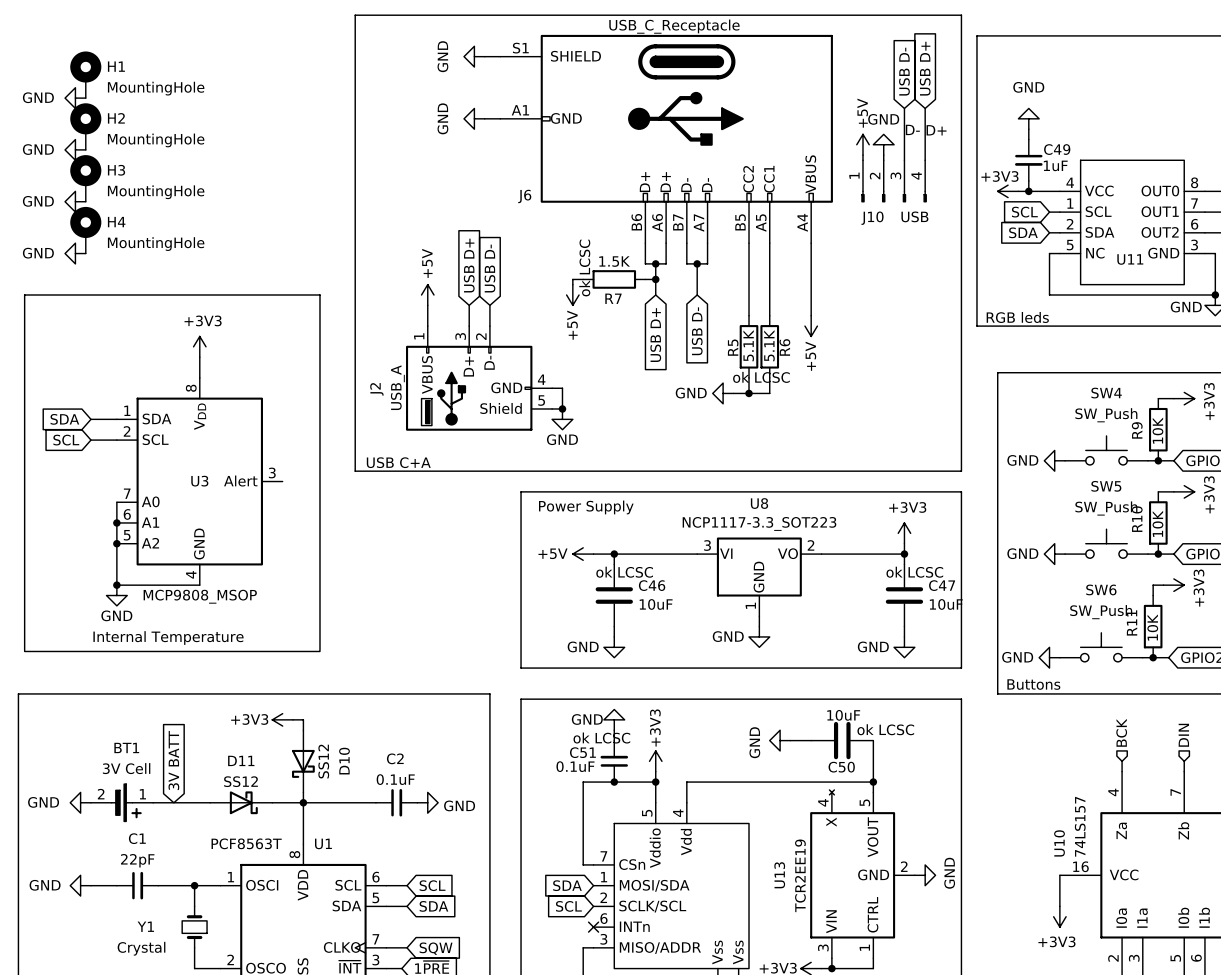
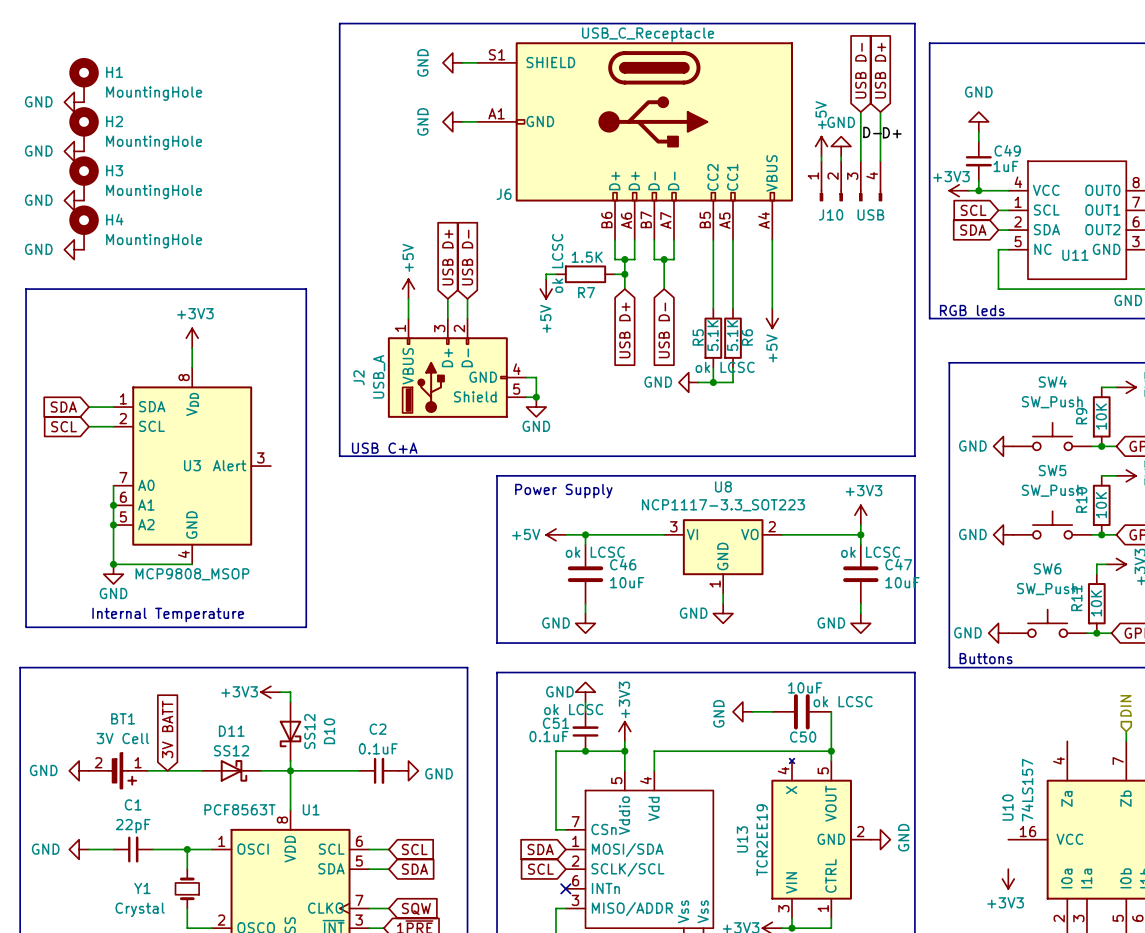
hierarchical label: BCK (1121, 732) -> none
wire: (1122, 761) (1122, 771) -> none
wire: (1059, 875) (1059, 906) -> none

